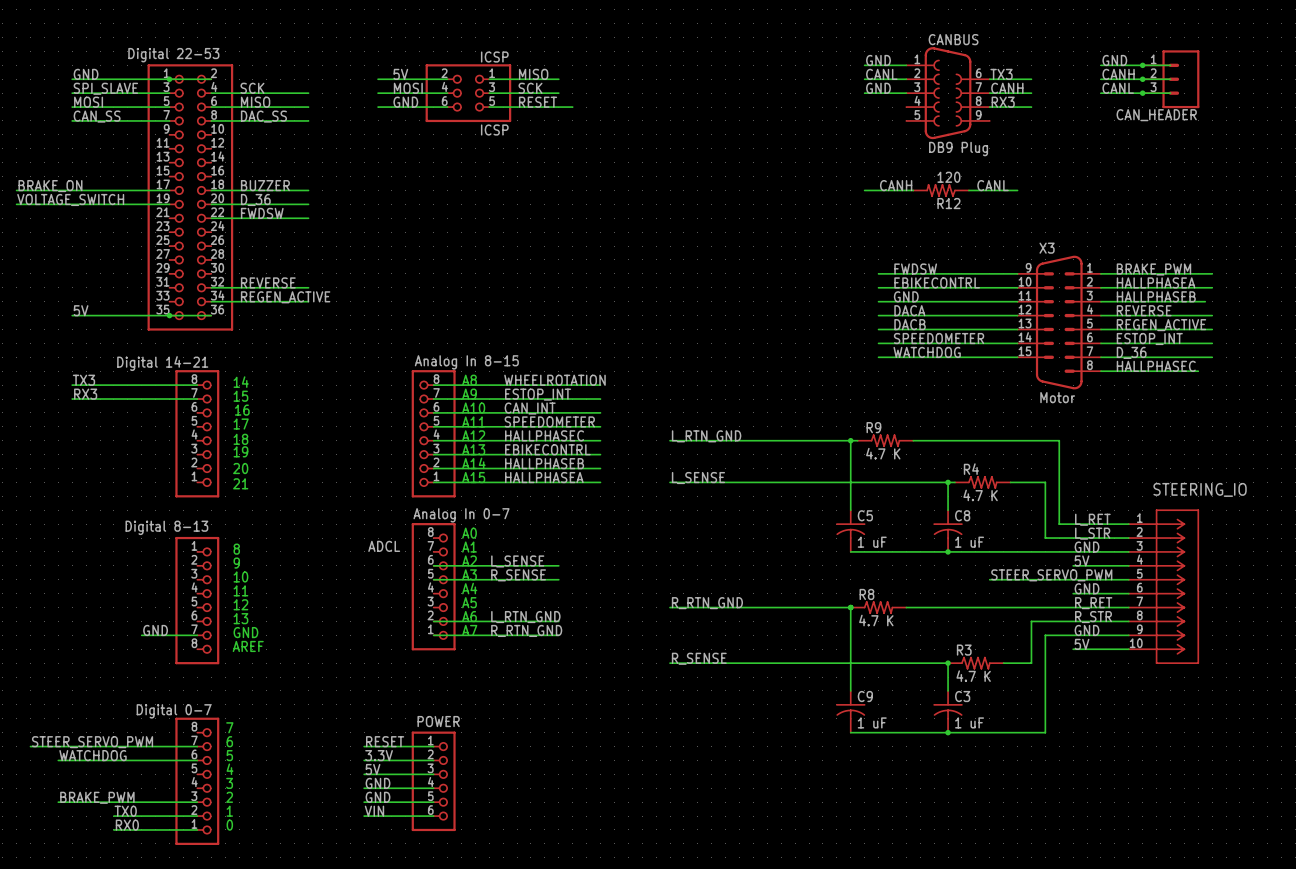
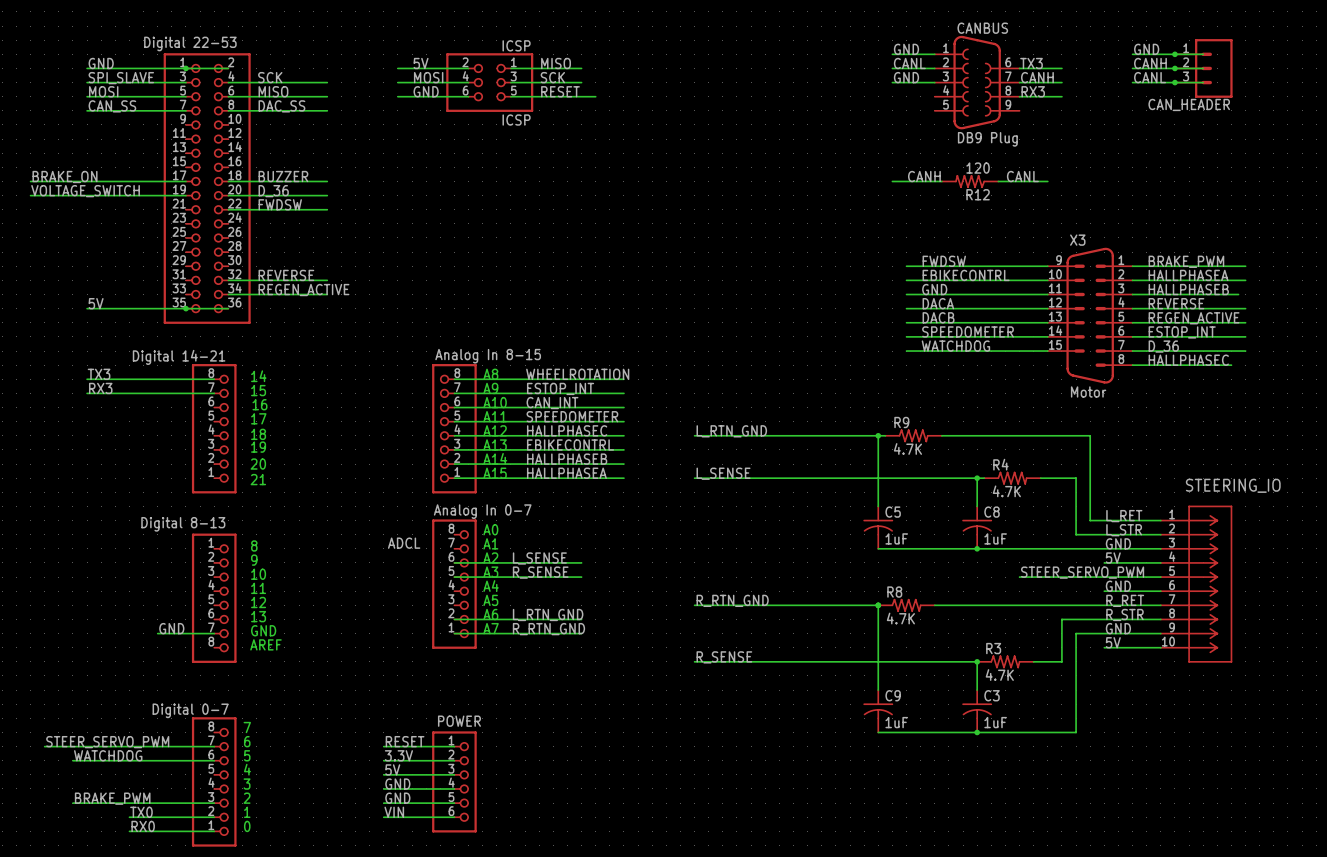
R9 value: 4.7 K (883, 453) -> 4.7K (907, 448)
R4 value: 4.7 K (980, 495) -> 4.7K (1006, 491)
C5 value: 1 uF (872, 542) -> 1uF (896, 538)
C8 value: 1 uF (969, 542) -> 1uF (995, 538)
R8 value: 4.7 K (876, 620) -> 4.7K (900, 618)
R3 value: 4.7 K (973, 676) -> 4.7K (999, 675)
C9 value: 1 uF (872, 722) -> 1uF (896, 722)
C3 value: 1 uF (969, 722) -> 1uF (995, 722)

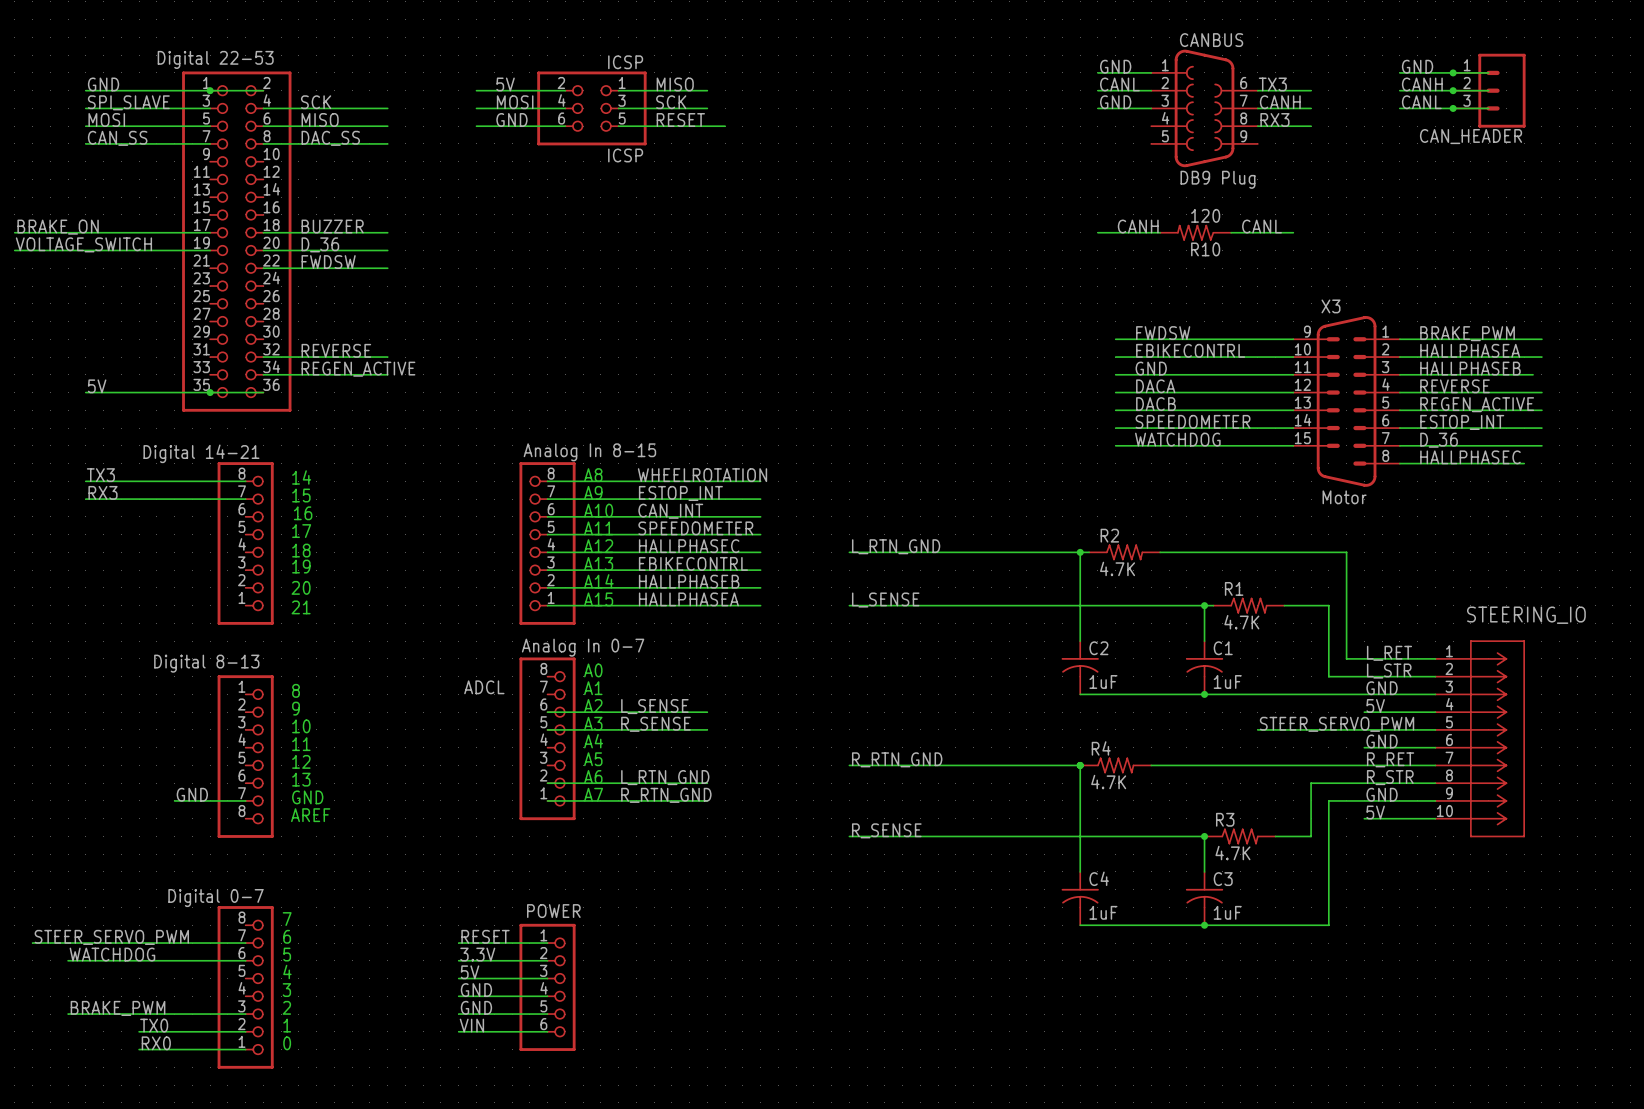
R12 name: R12 (978, 194) -> R10 (1205, 249)
R9 name: R9 (901, 422) -> R2 (1109, 535)
R4 name: R4 (1000, 464) -> R1 (1234, 588)
C5 name: C5 (893, 512) -> C2 (1098, 648)
C8 name: C8 (992, 512) -> C1 (1223, 648)
R8 name: R8 (894, 592) -> R4 (1101, 748)
C9 name: C9 (893, 695) -> C4 (1099, 878)

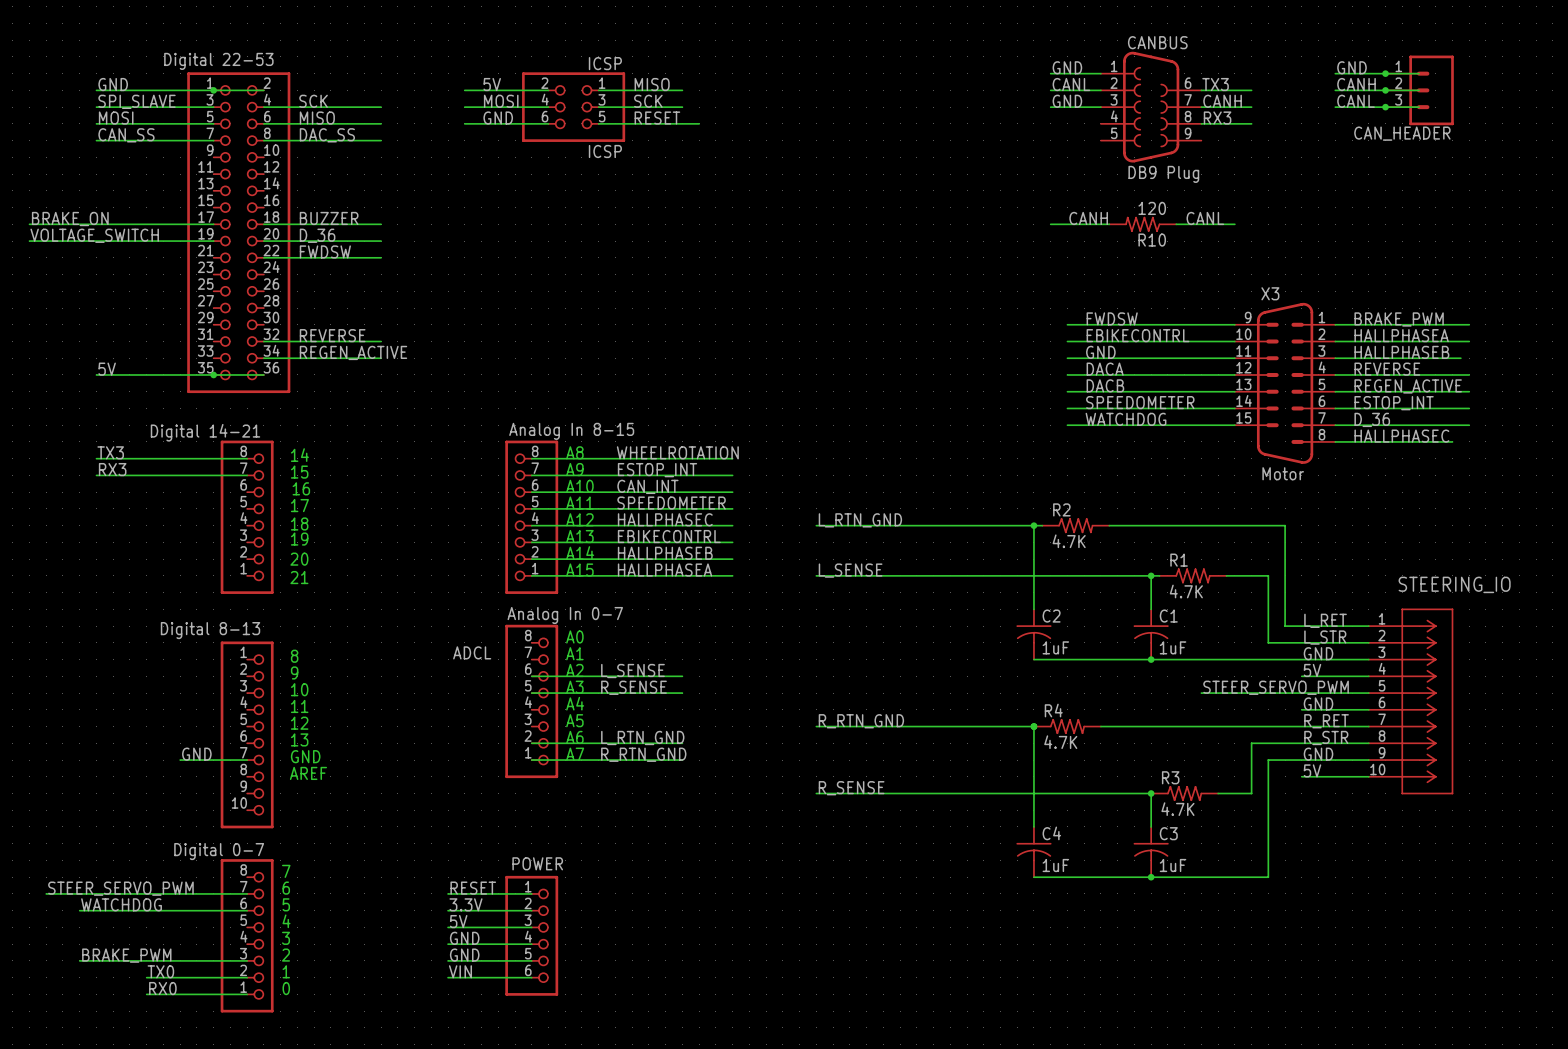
part: Digital 8-13 (245, 756) -> none
part: none -> Digital 8-13 (247, 734)

